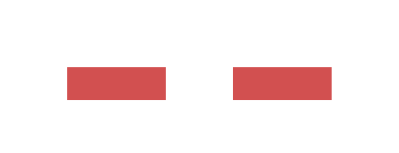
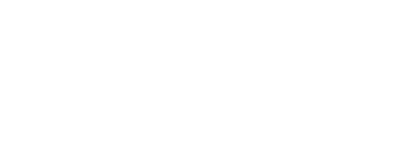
part: (199, 83) -> none

